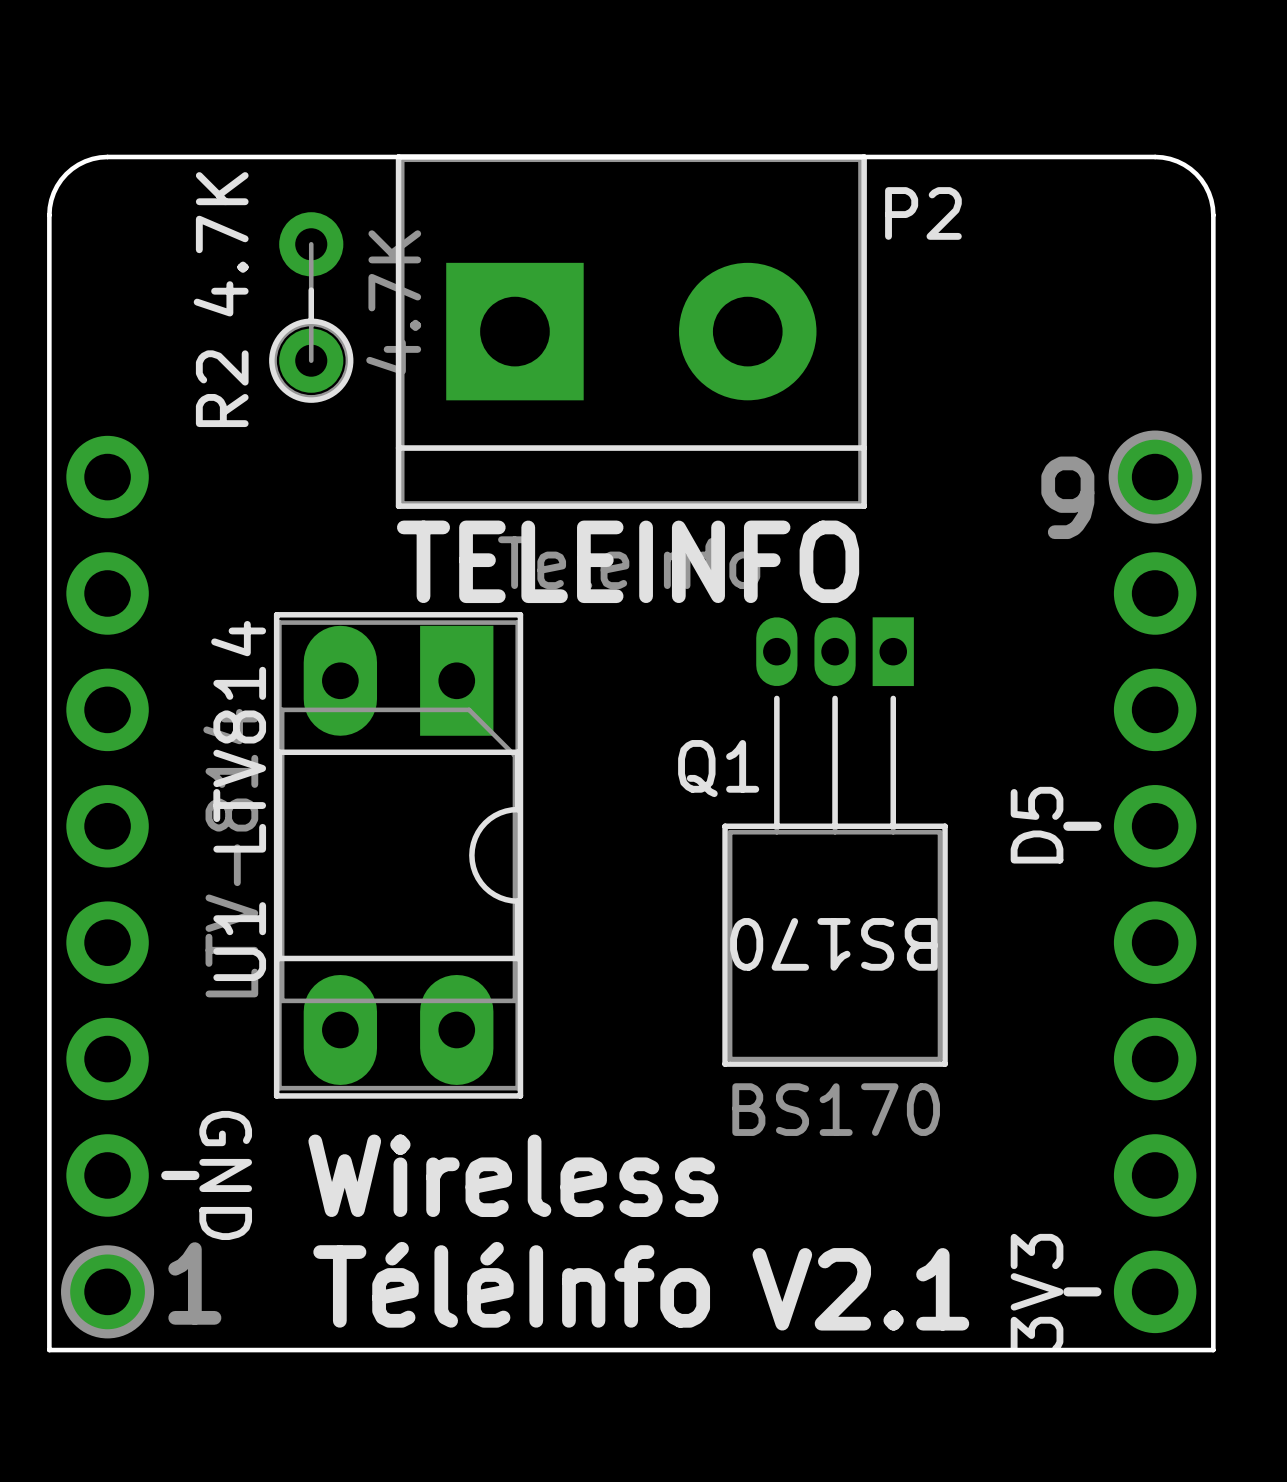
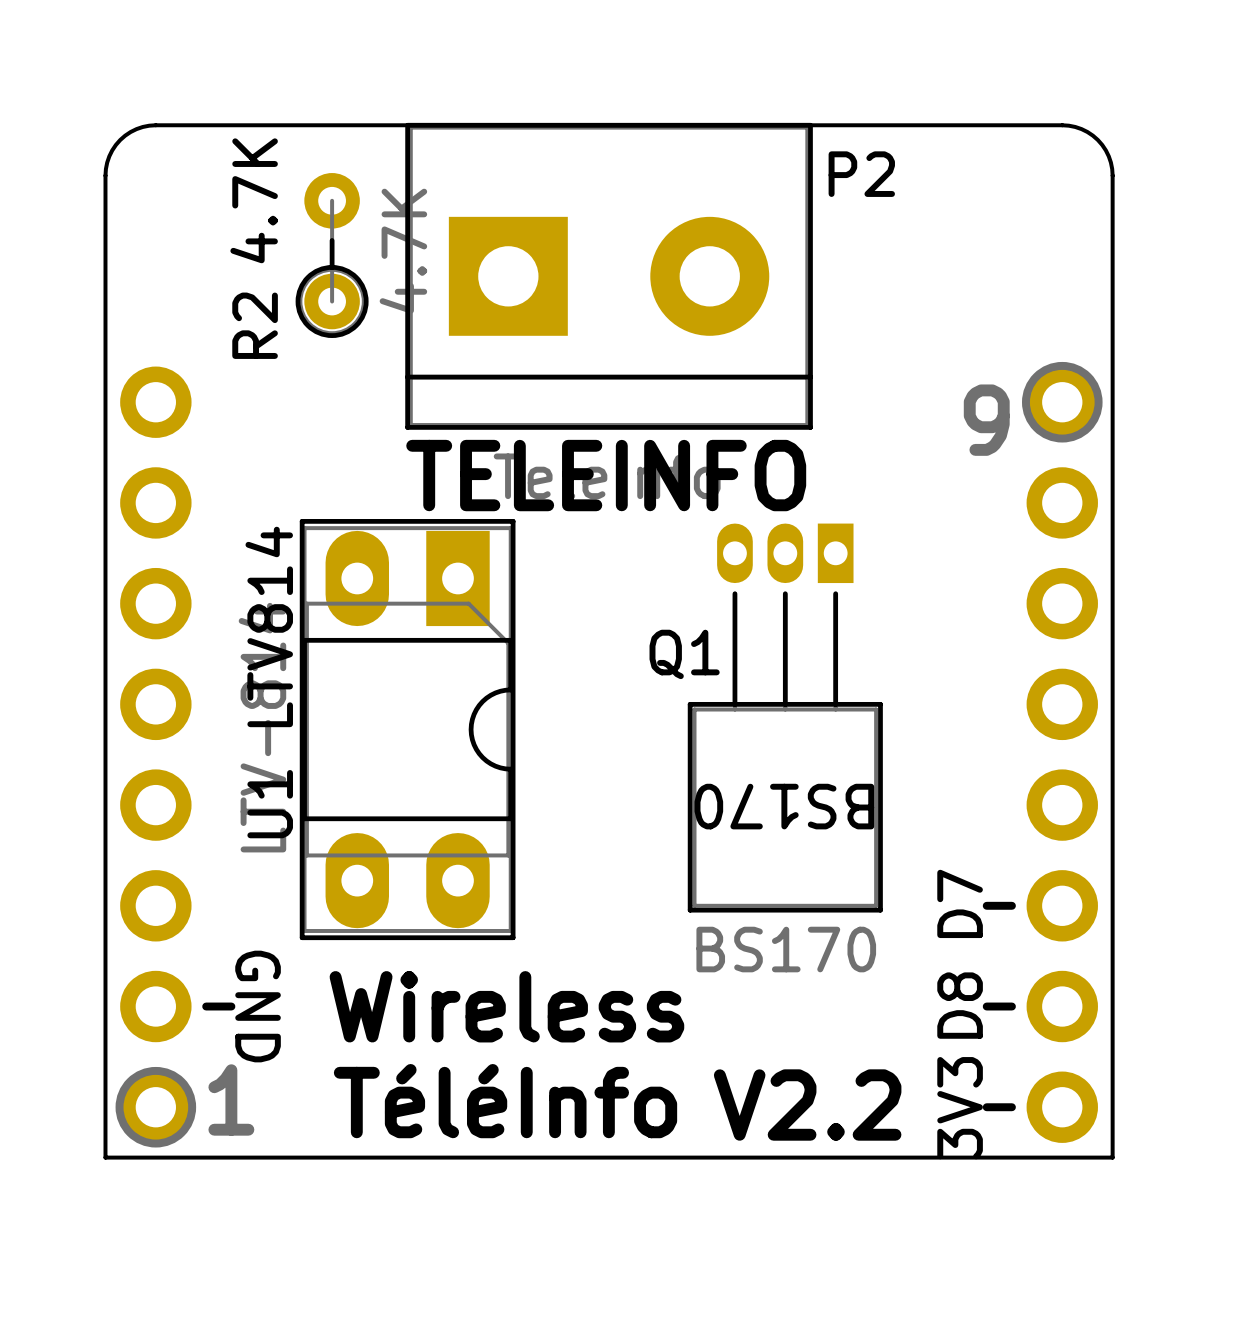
text: D5 (1037, 825) -> none
line: (1067, 826) (1096, 826) -> (986, 905) (1011, 905)
text: none -> D7 (960, 903)
text: none -> D8 (960, 1005)
line: none -> (986, 1006) (1011, 1006)
text: V2.1 (860, 1289) -> V2.2 (807, 1105)

